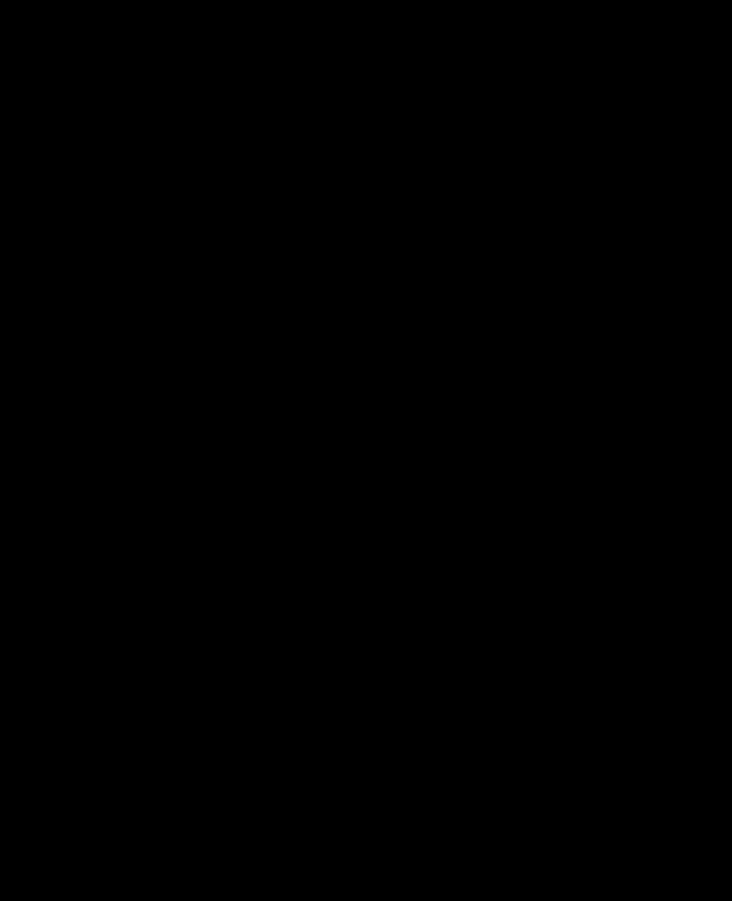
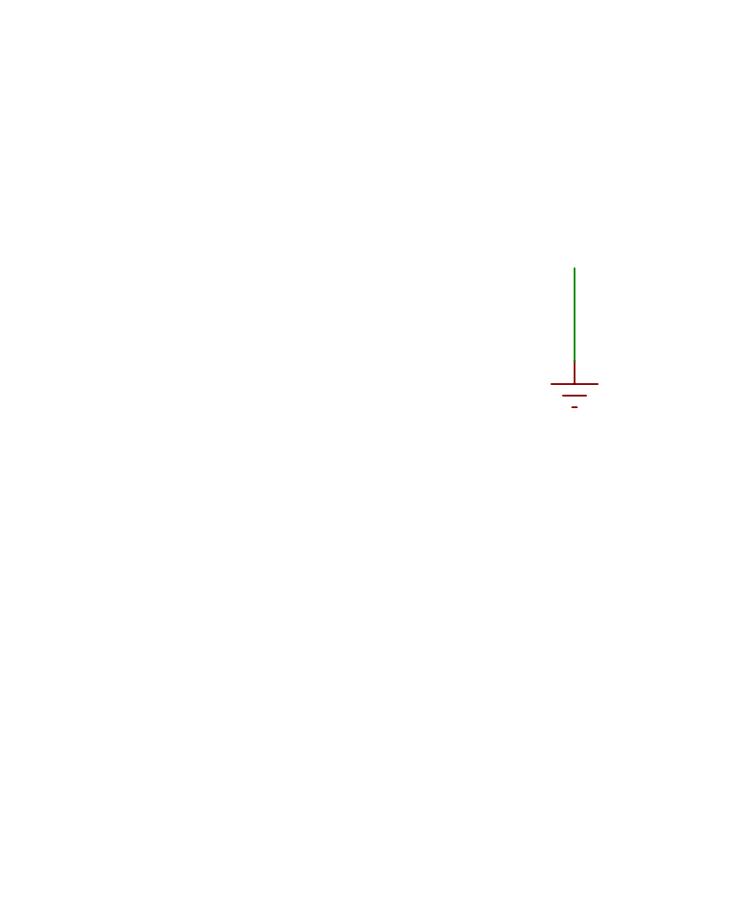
wire: none -> (574, 268) (574, 360)
power symbol: none -> (574, 384)

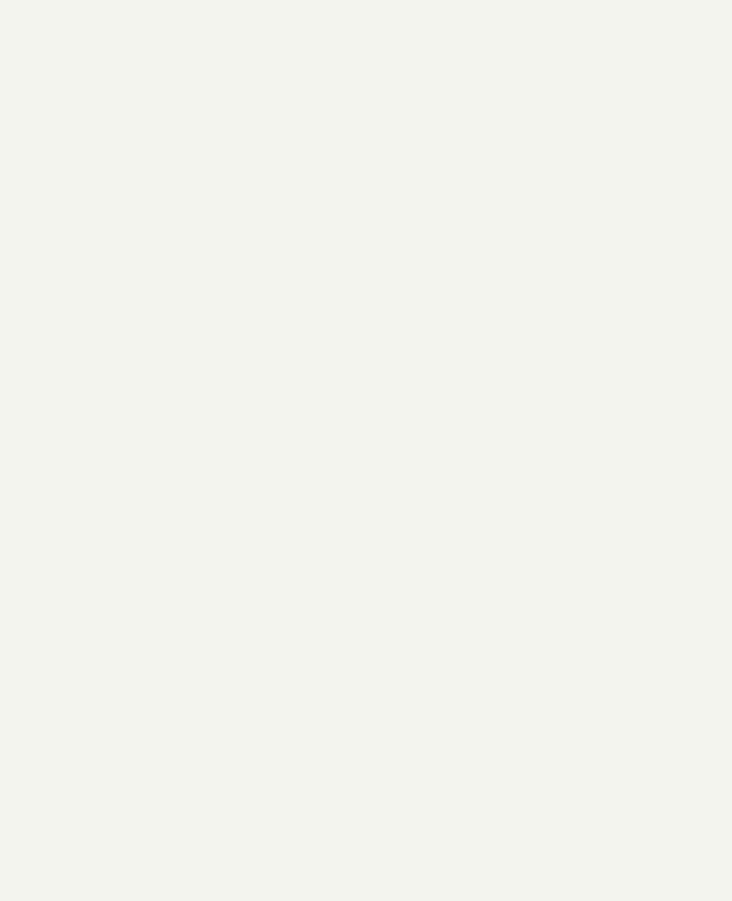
wire: (574, 268) (574, 360) -> none
power symbol: (574, 384) -> none

